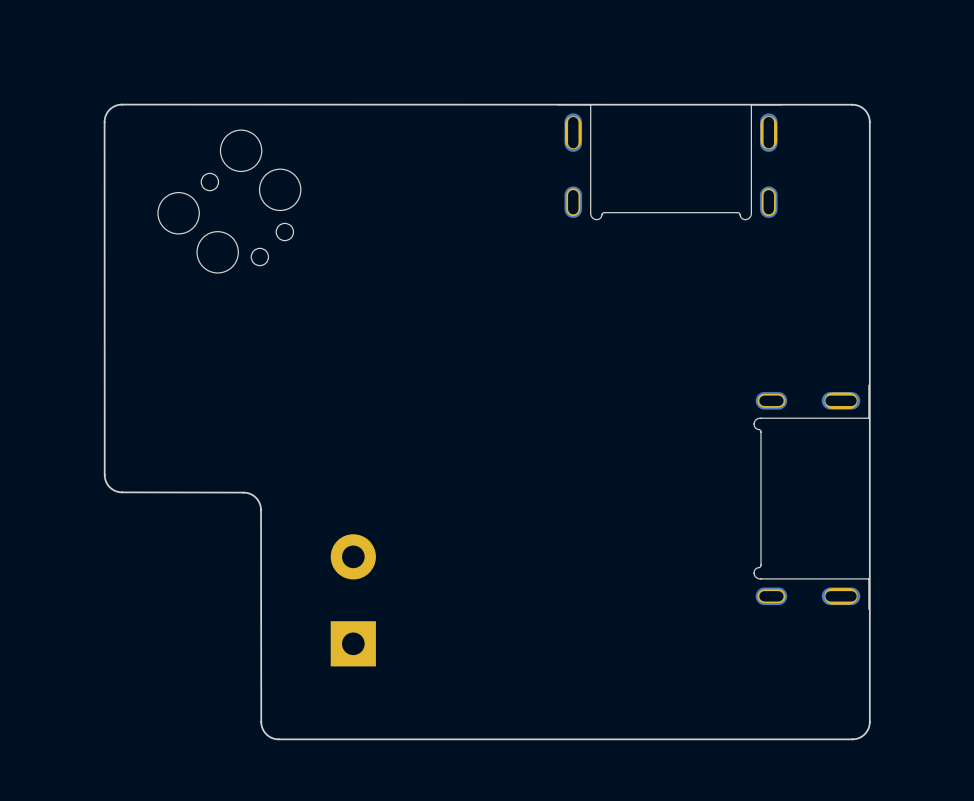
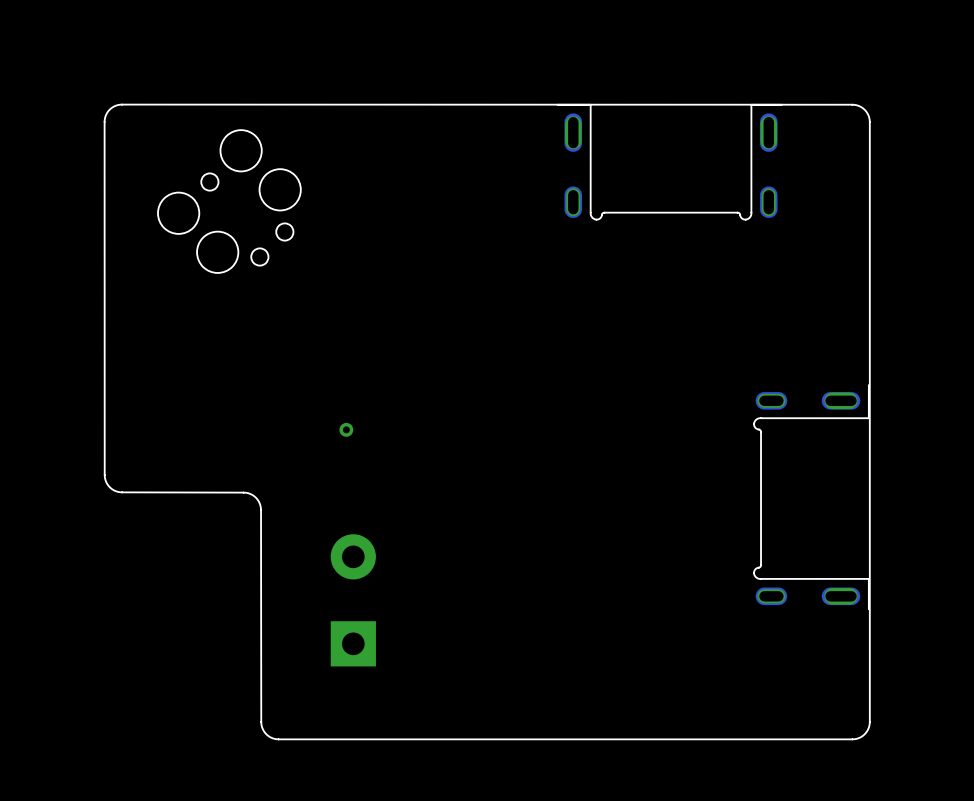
via: none -> (346, 429)

